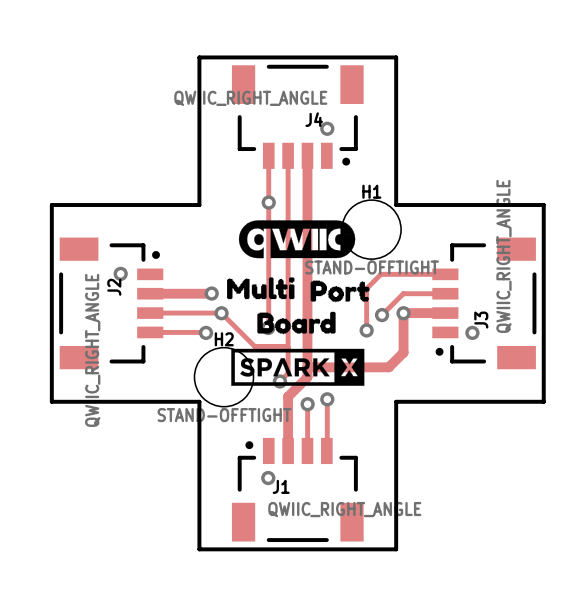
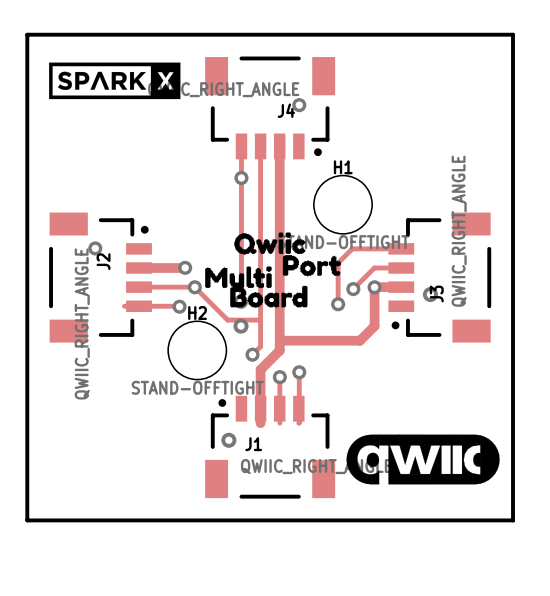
board edge: (199, 57) (199, 205) (51, 205) -> (173, 34) (27, 34) (27, 180)
board edge: (396, 57) (396, 205) (543, 205) -> (367, 34) (513, 34) (513, 180)
J4 position: (297, 116) -> (270, 107)
drawing: [238, 220, 356, 259] -> none
drawing: none -> [234, 232, 306, 255]
drawing position: (260, 288) -> (238, 277)
J2 position: (111, 303) -> (100, 277)
J3 position: (484, 303) -> (439, 277)
via position: (472, 332) -> (430, 294)
via: none -> (241, 326)
drawing position: (297, 367) -> (114, 80)
board edge: (51, 401) (199, 401) (199, 549) -> (27, 374) (27, 520) (173, 520)
board edge: (543, 401) (396, 401) (396, 549) -> (513, 374) (513, 520) (367, 520)
drawing: none -> [346, 434, 500, 485]
via position: (268, 478) -> (228, 440)
J1 position: (297, 489) -> (270, 447)

